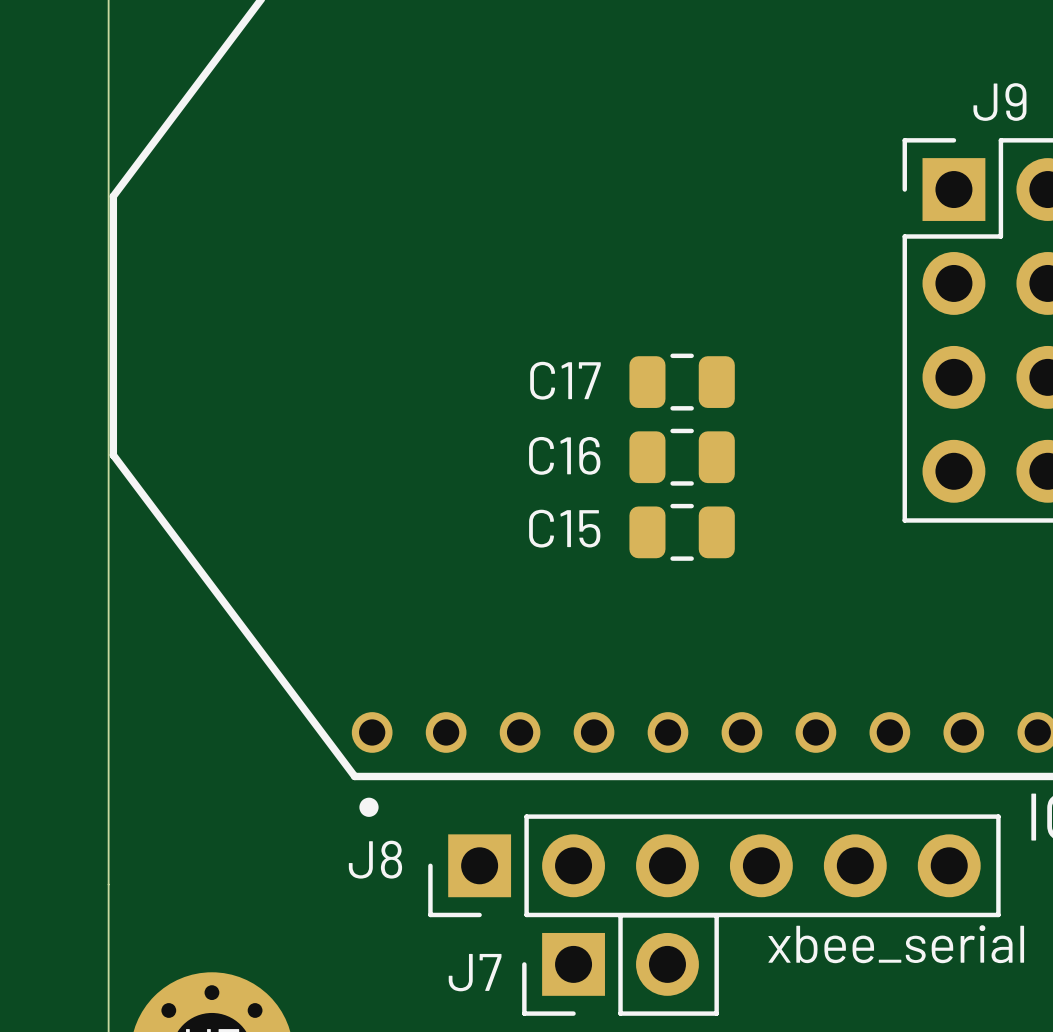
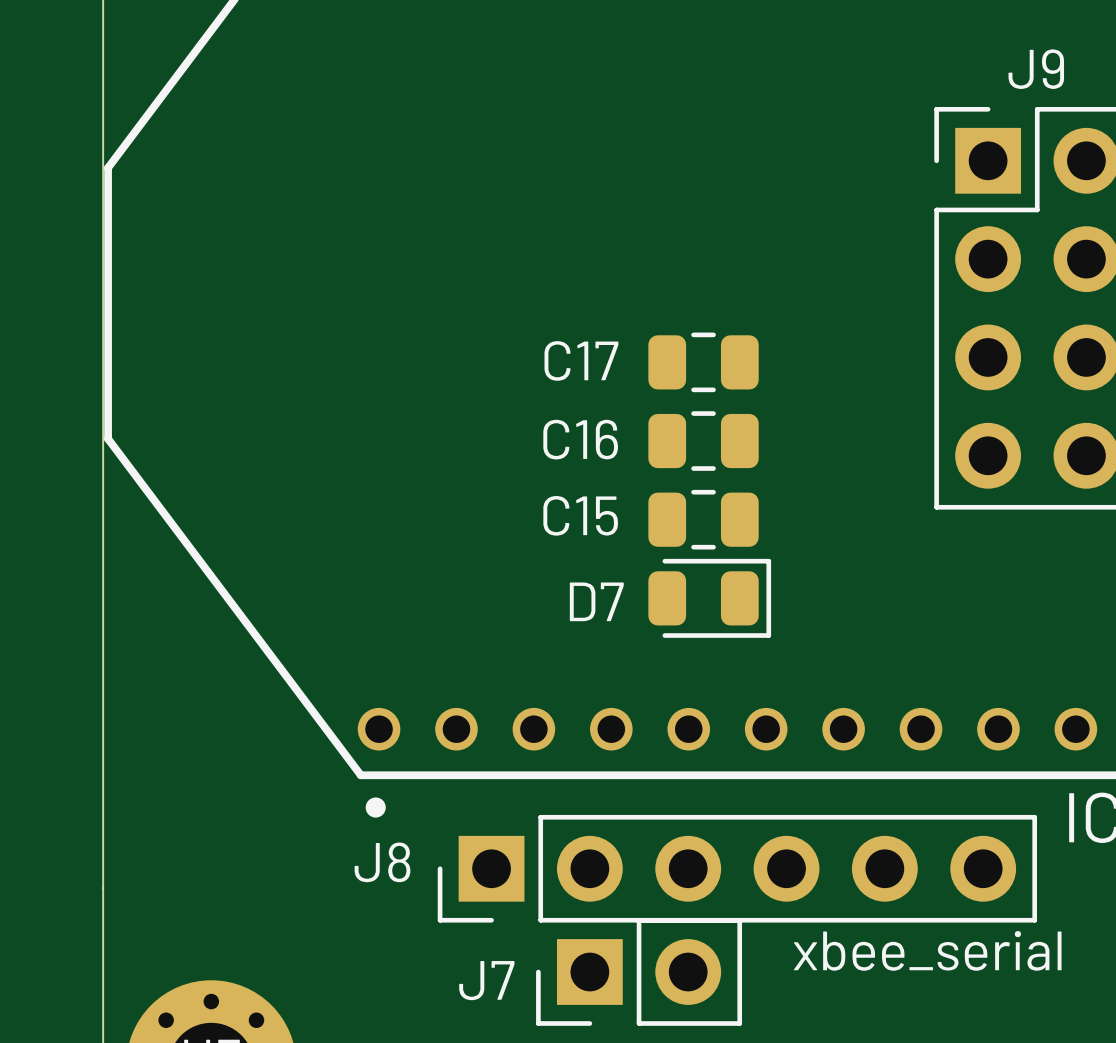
D7: none -> (709, 598)

